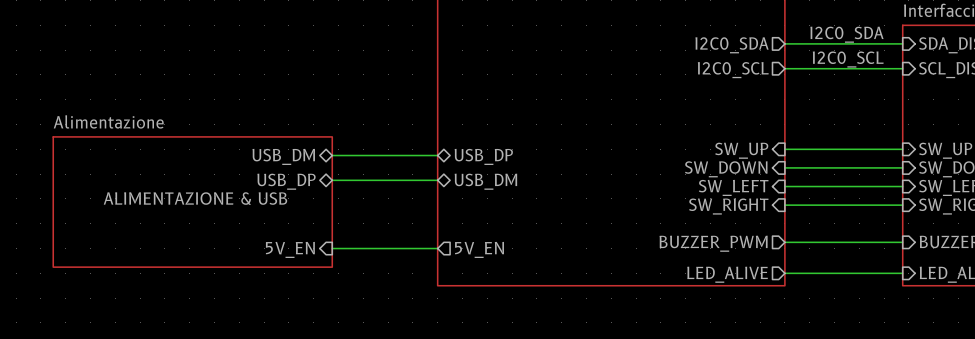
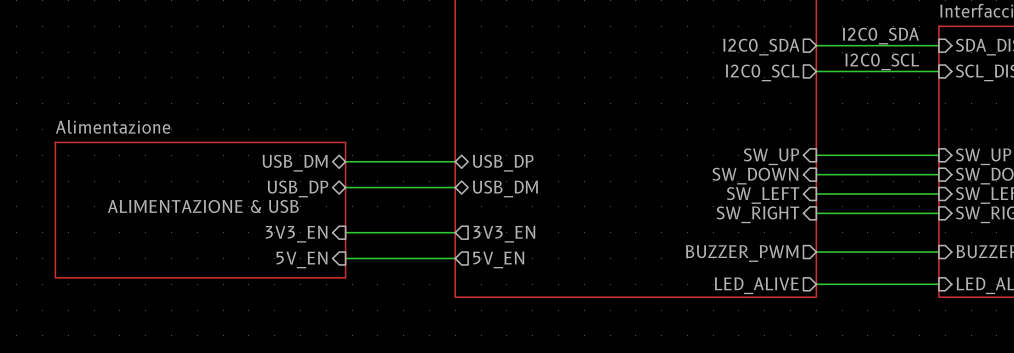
wire: none -> (345, 232) (455, 232)
sheet pin: none -> 3V3_EN (296, 234)
sheet pin: none -> 3V3_EN (504, 234)

